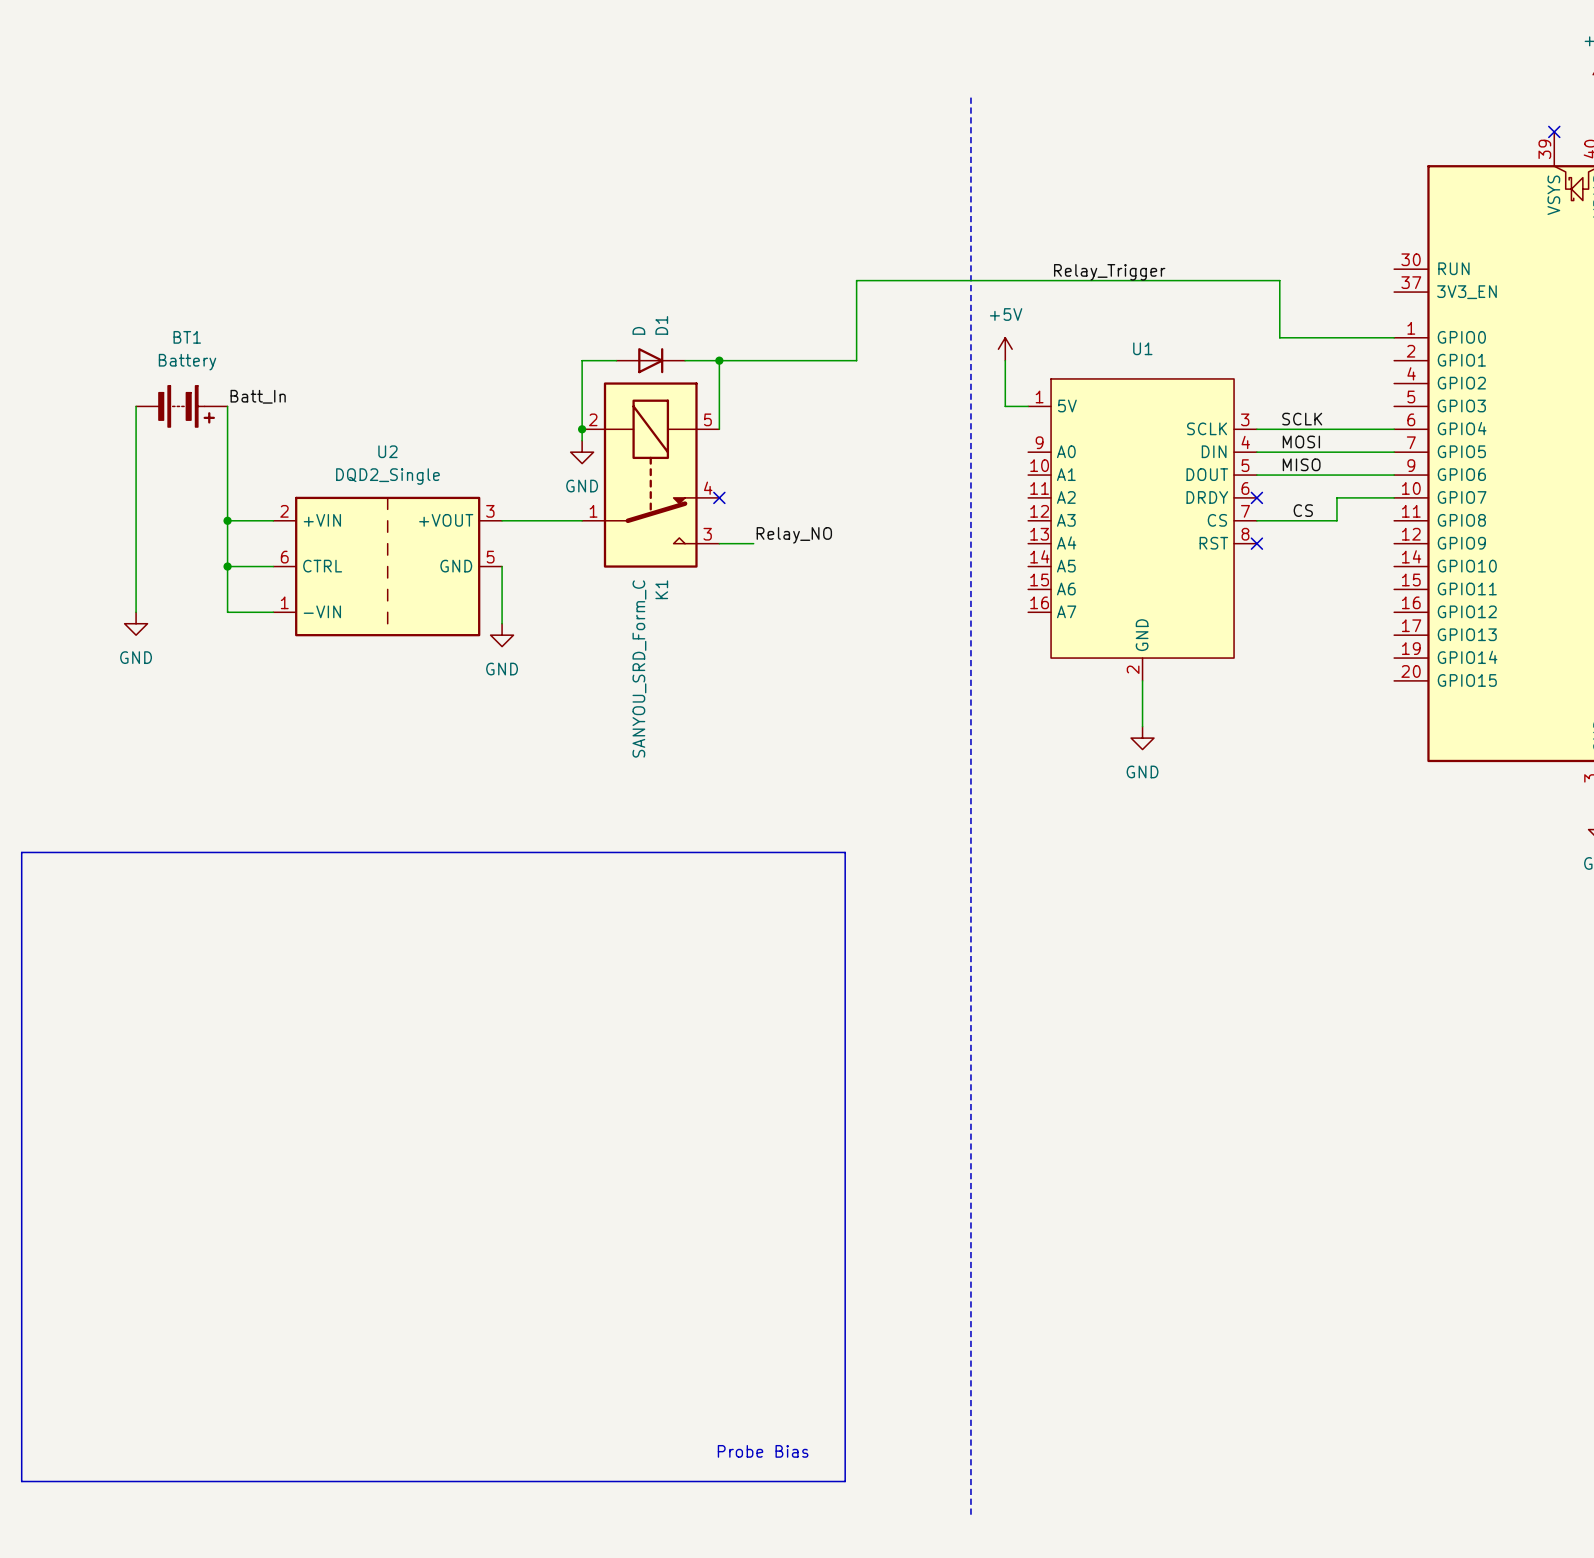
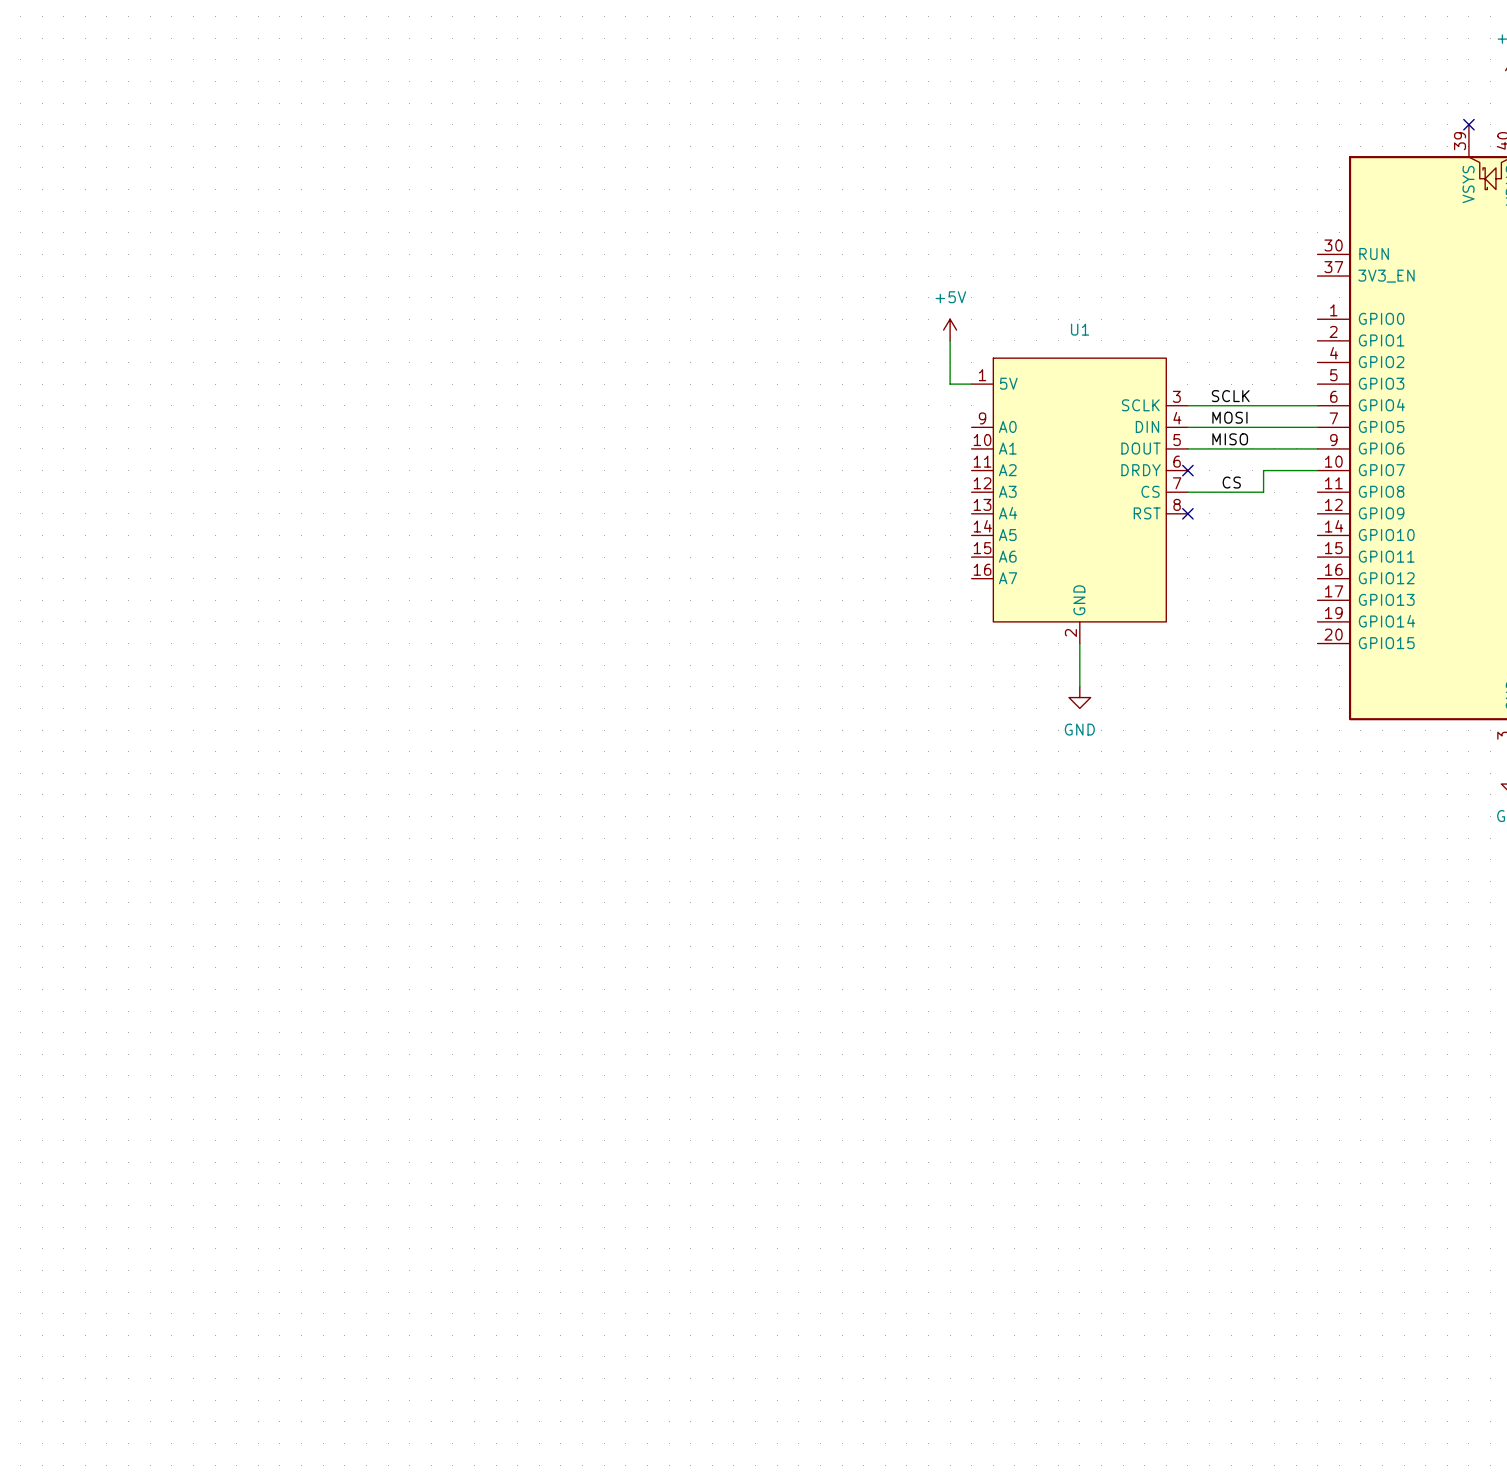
line: (970, 97) (970, 1515) -> none
label: Relay_Trigger (1109, 272) -> none
wire: (1394, 337) (1279, 337) (1279, 280) (856, 280) (856, 360) (685, 360) -> none
wire: (616, 360) (582, 360) (582, 440) -> none
D1: D (650, 360) -> none
wire: (719, 360) (719, 429) -> none
junction: (719, 360) -> none
label: Batt_In (258, 396) -> none
wire: (136, 406) (136, 612) -> none
BT1: Battery (181, 406) -> none
wire: (227, 406) (227, 612) (273, 612) -> none
junction: (582, 429) -> none
power symbol: GND (582, 452) -> none
K1: SANYOU_SRD_Form_C (650, 475) -> none
no-connect mark: (719, 497) -> none
wire: (227, 520) (273, 520) -> none
junction: (227, 520) -> none
wire: (502, 520) (582, 520) -> none
label: Relay_NO (794, 535) -> none
wire: (719, 543) (753, 543) -> none
wire: (227, 566) (273, 566) -> none
junction: (227, 566) -> none
U2: DQD2_Single (387, 566) -> none
wire: (502, 566) (502, 623) -> none
power symbol: GND (136, 623) -> none
power symbol: GND (502, 635) -> none
line: (21, 852) (845, 852) (845, 1481) (21, 1481) (21, 852) -> none
text: Probe Bias (763, 1451) -> none

